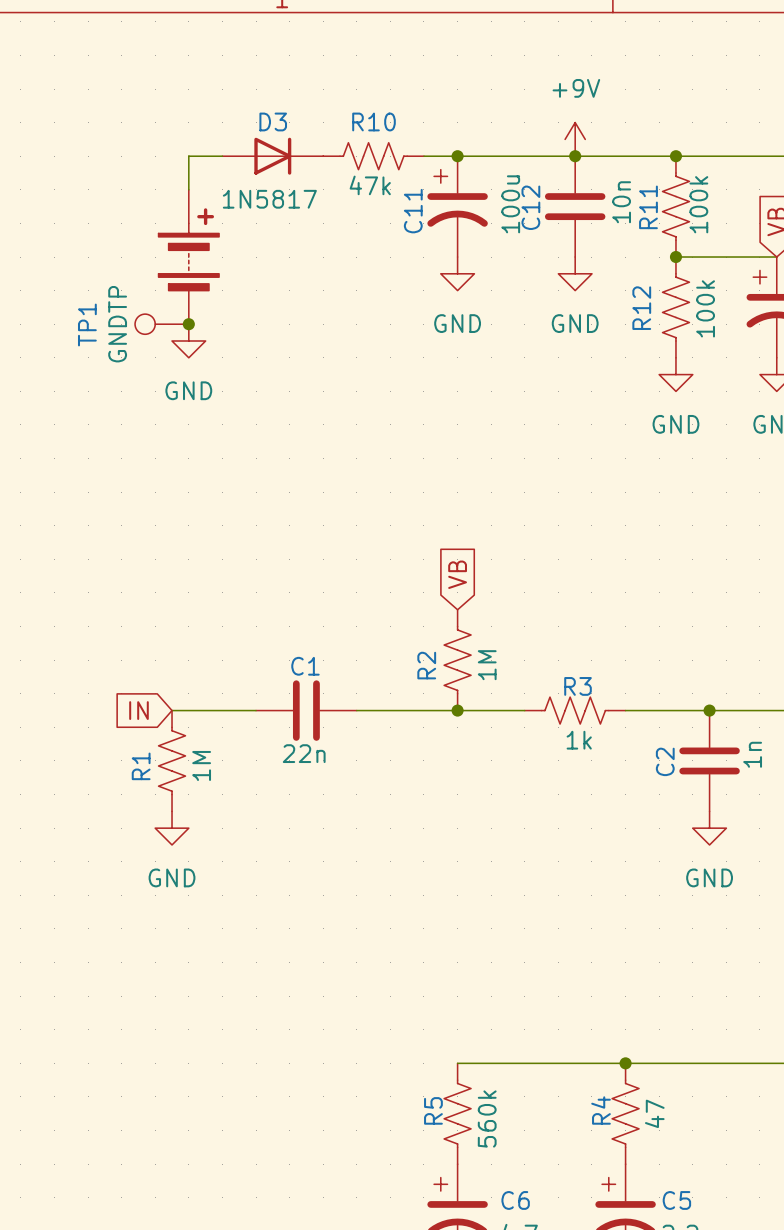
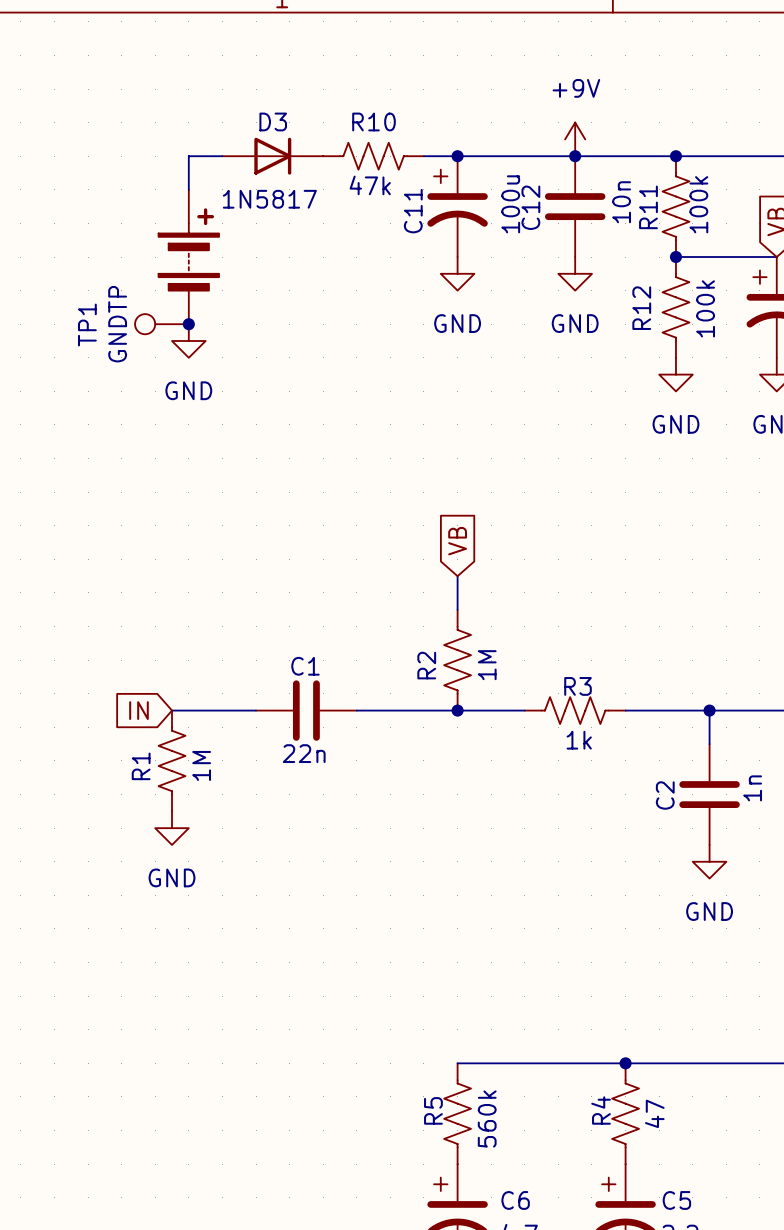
global label position: VB (457, 574) -> VB (457, 541)
wire: none -> (457, 576) (457, 609)
C2 position: (709, 760) -> (709, 794)
power symbol position: GND (709, 828) -> GND (709, 861)

